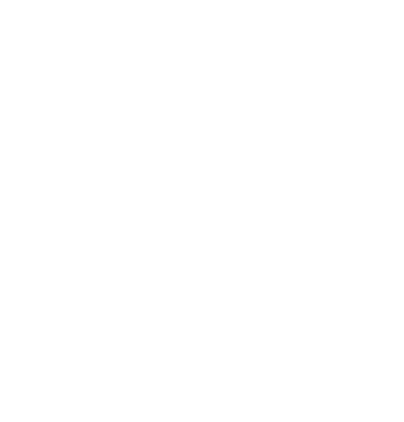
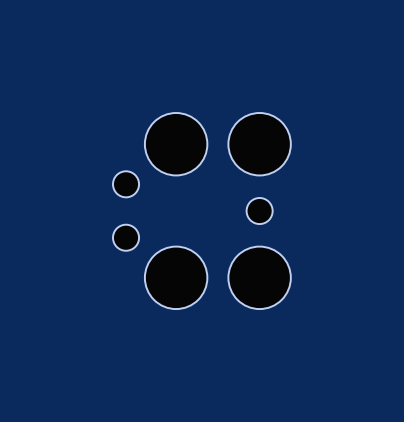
part: none -> (201, 211)

